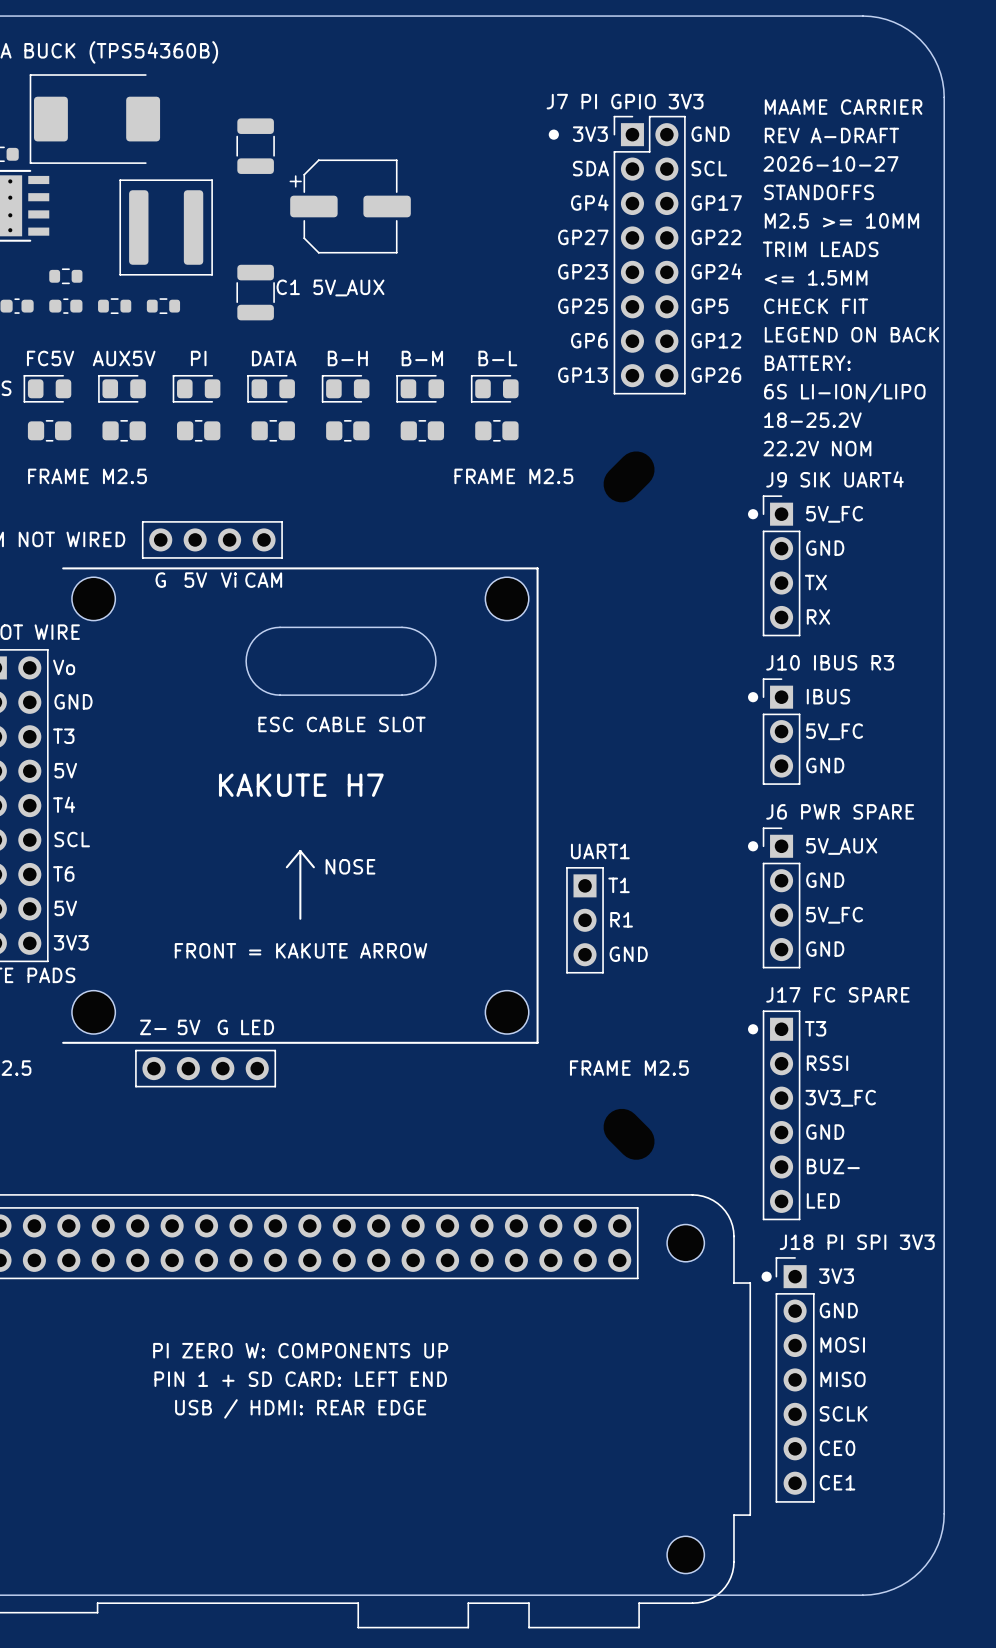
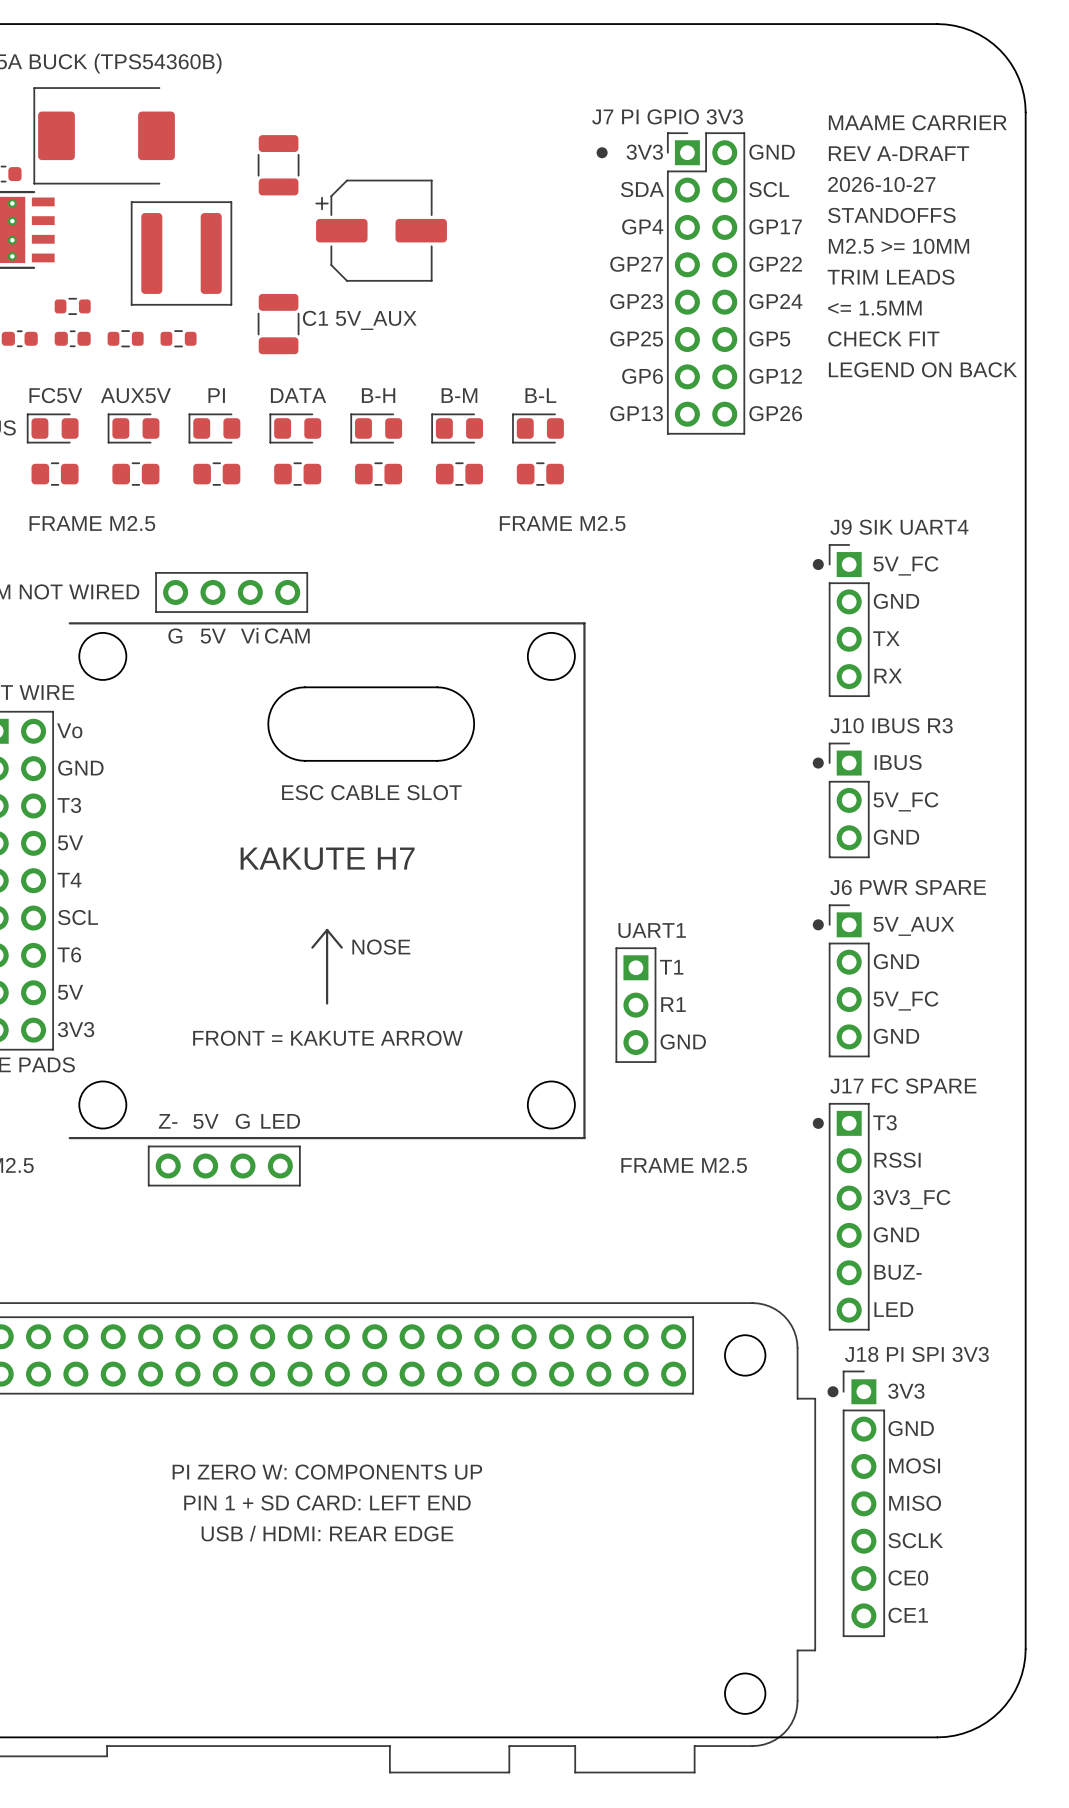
text: BATTERY: (807, 363) -> none
text: 6S LI-ION/LIPO (844, 392) -> none
text: 18-25.2V (812, 420) -> none
text: 22.2V NOM (817, 448) -> none

